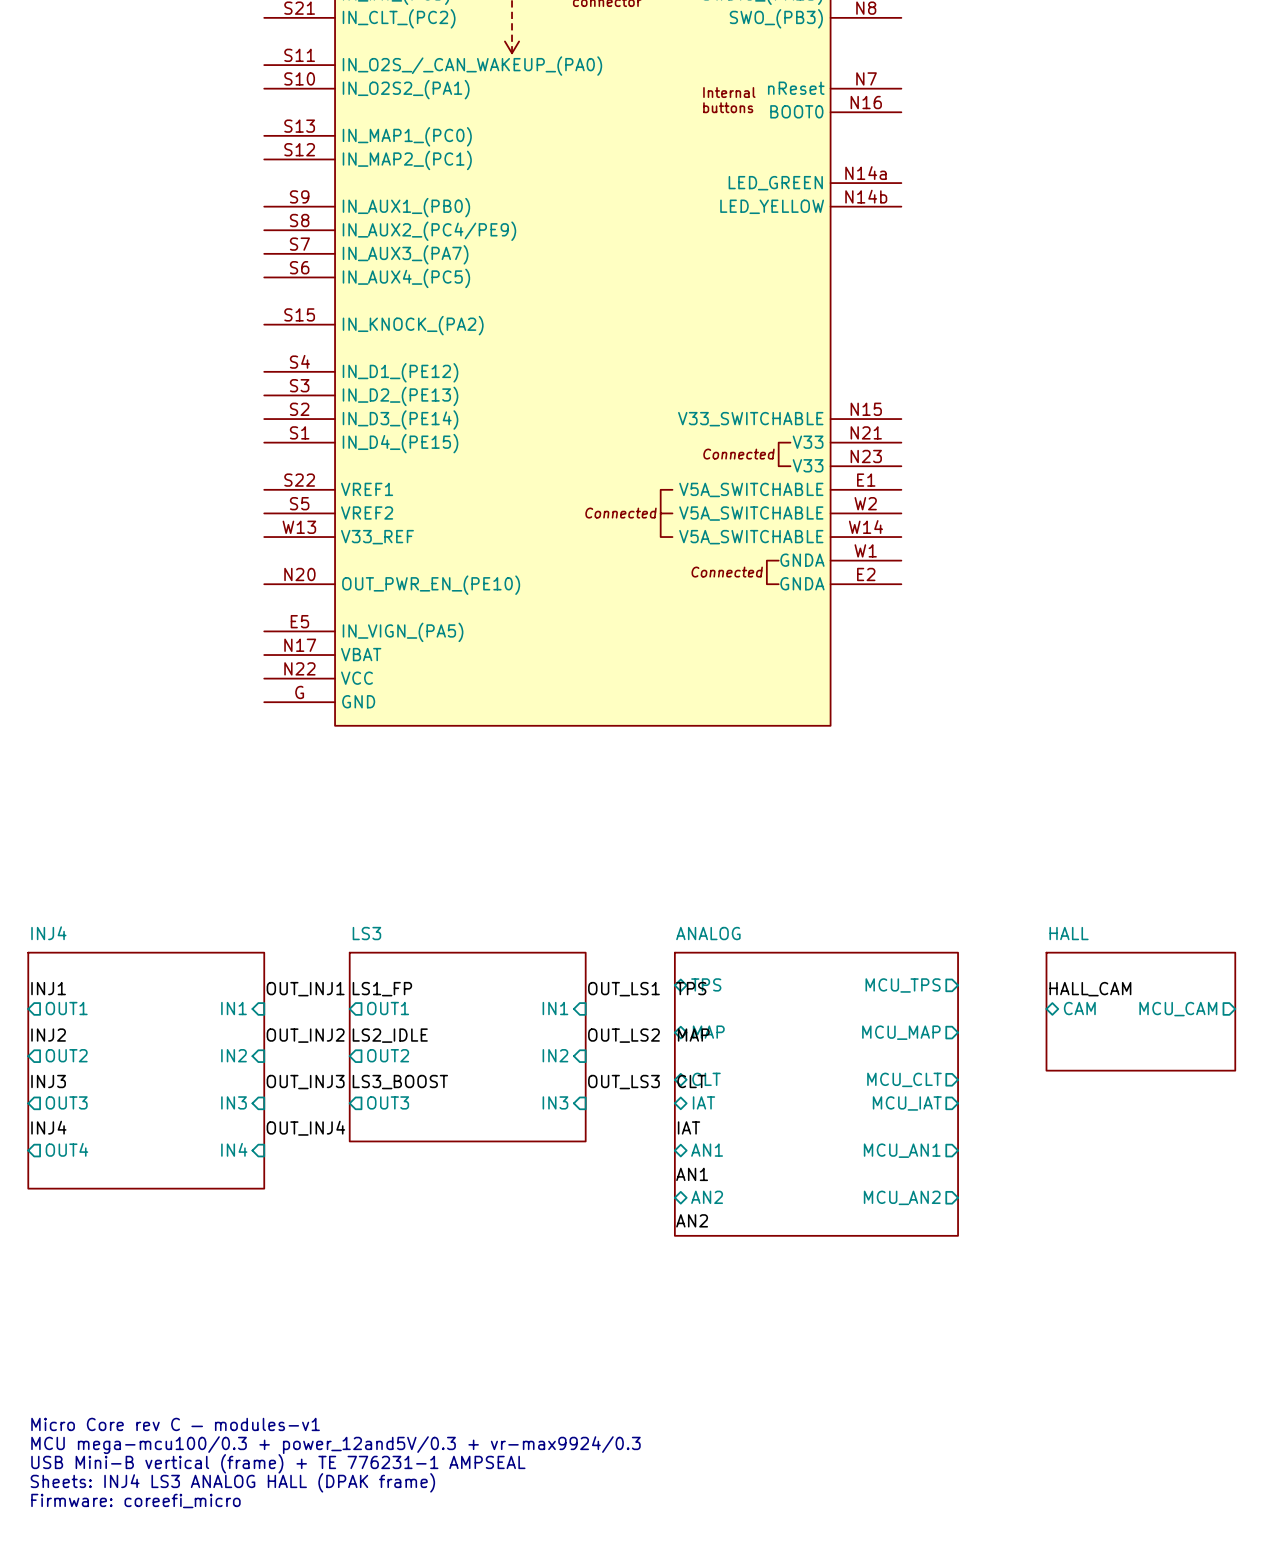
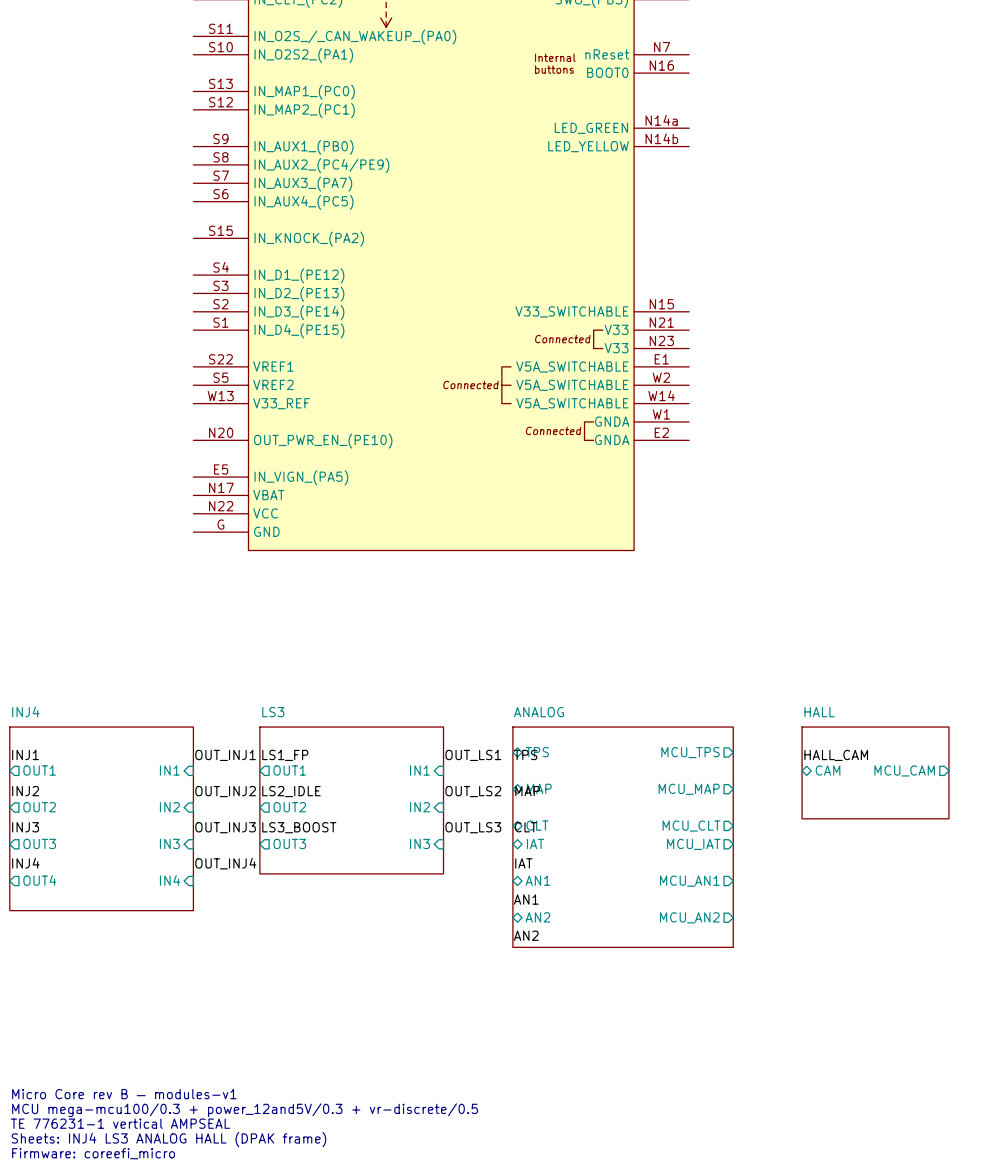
text: Micro Core rev C — modules-v1 (175, 1424) -> Micro Core rev B — modules-v1 (124, 1094)
text: MCU mega-mcu100/0.3 + power_12and5V/0.3 + vr-max9924/0.3 (335, 1445) -> MCU mega-mcu100/0.3 + power_12and5V/0.3 + vr-discrete/0.5 (245, 1110)
text: USB Mini-B vertical (frame) + TE 776231-1 AMPSEAL (278, 1463) -> TE 776231-1 vertical AMPSEAL (120, 1123)

